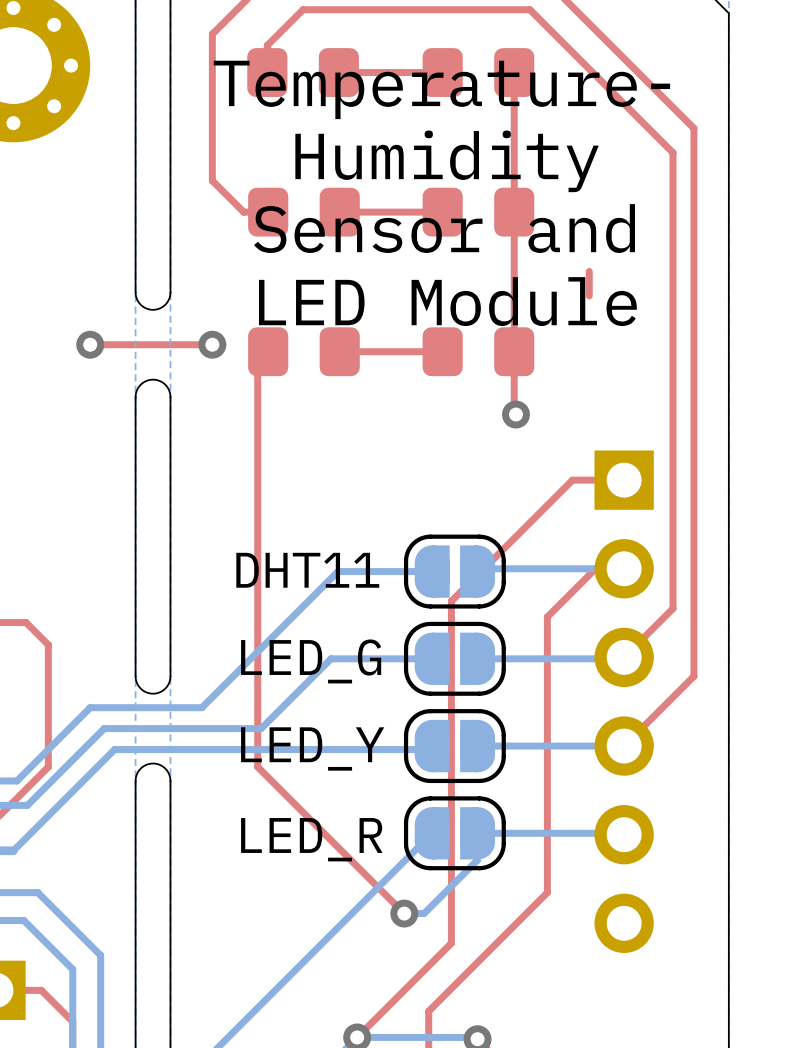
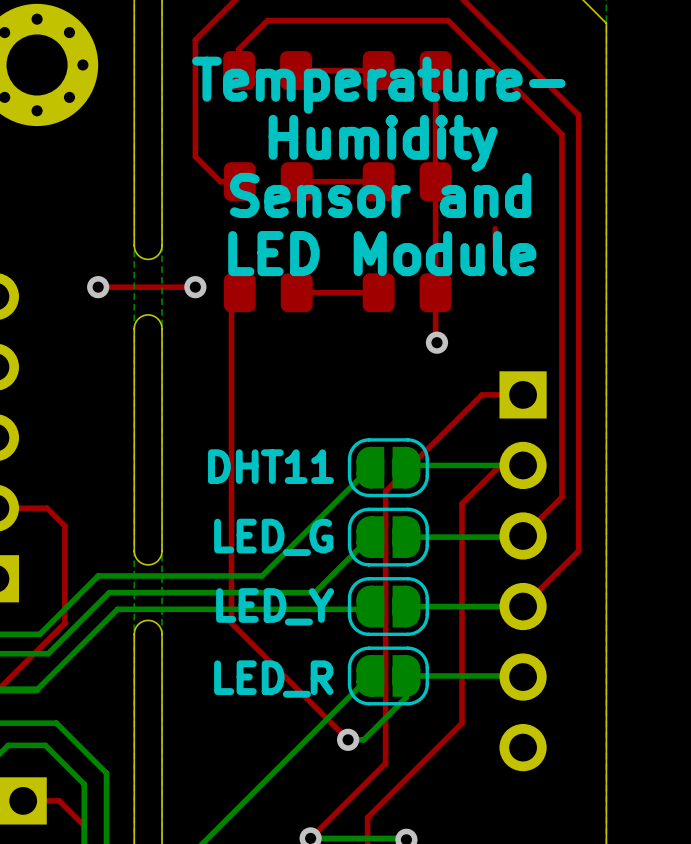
bottom track: (432, 571) (337, 571) (201, 707) -> (370, 467) (262, 575) (187, 575)
bottom track: (432, 658) (331, 658) (261, 728) -> (370, 537) (314, 592) (234, 592)

